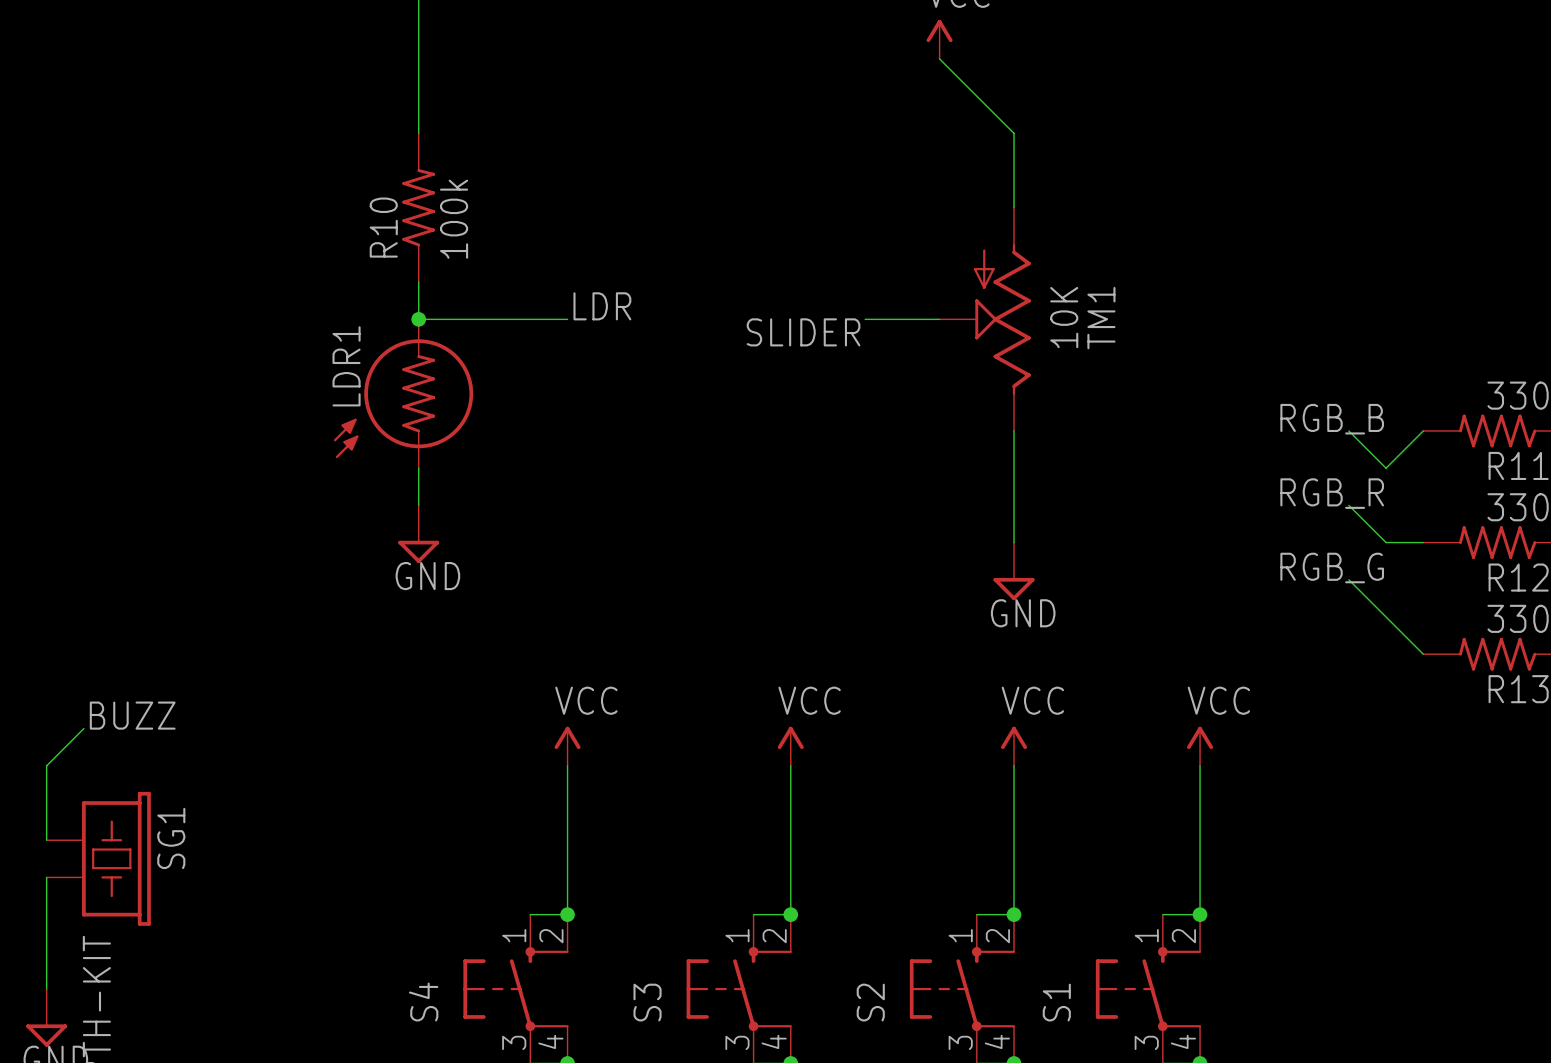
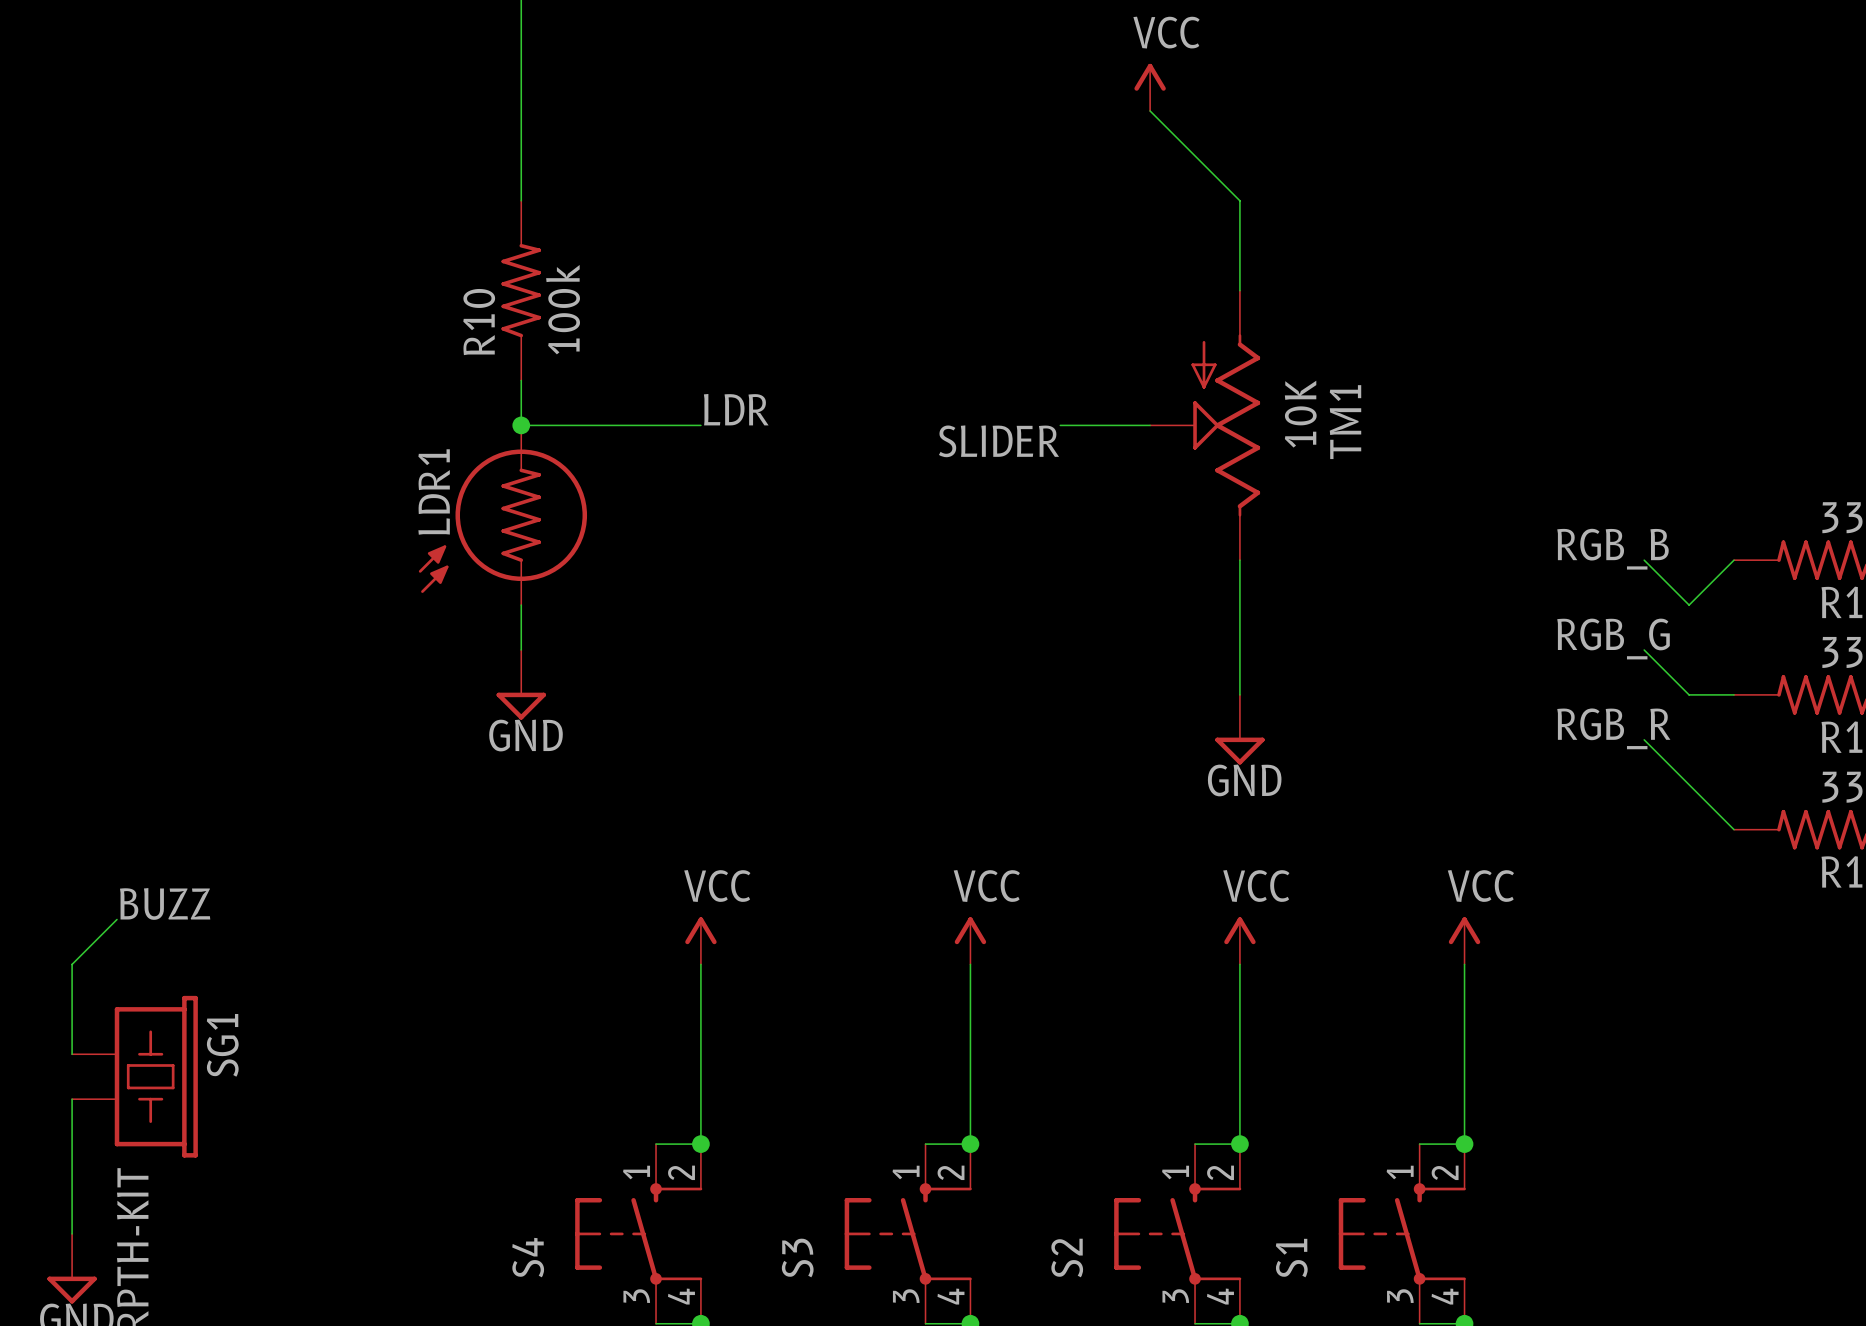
label: RGB_R (1332, 493) -> RGB_G (1613, 639)
label: RGB_G (1332, 568) -> RGB_R (1613, 728)

